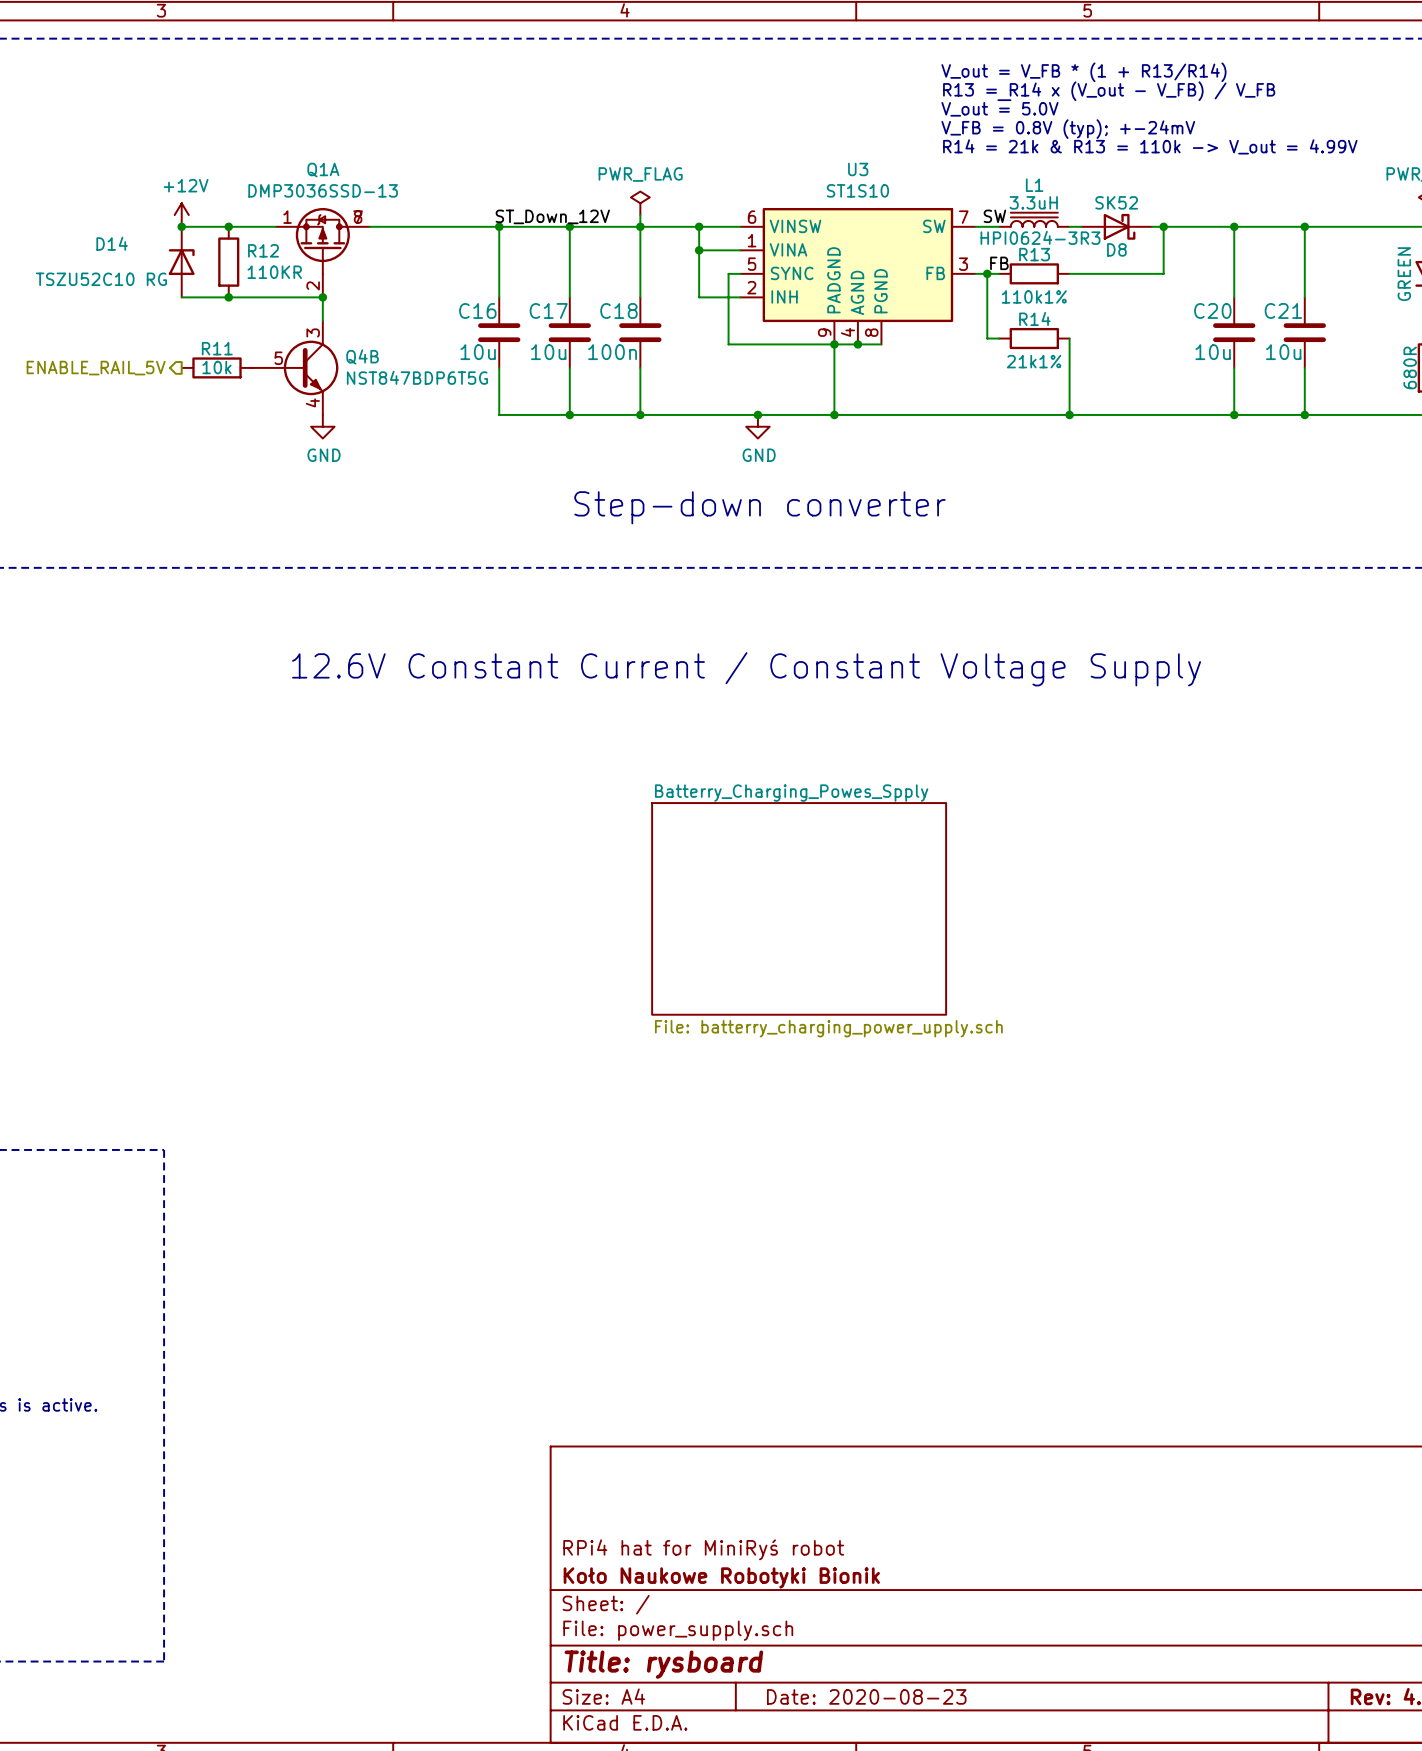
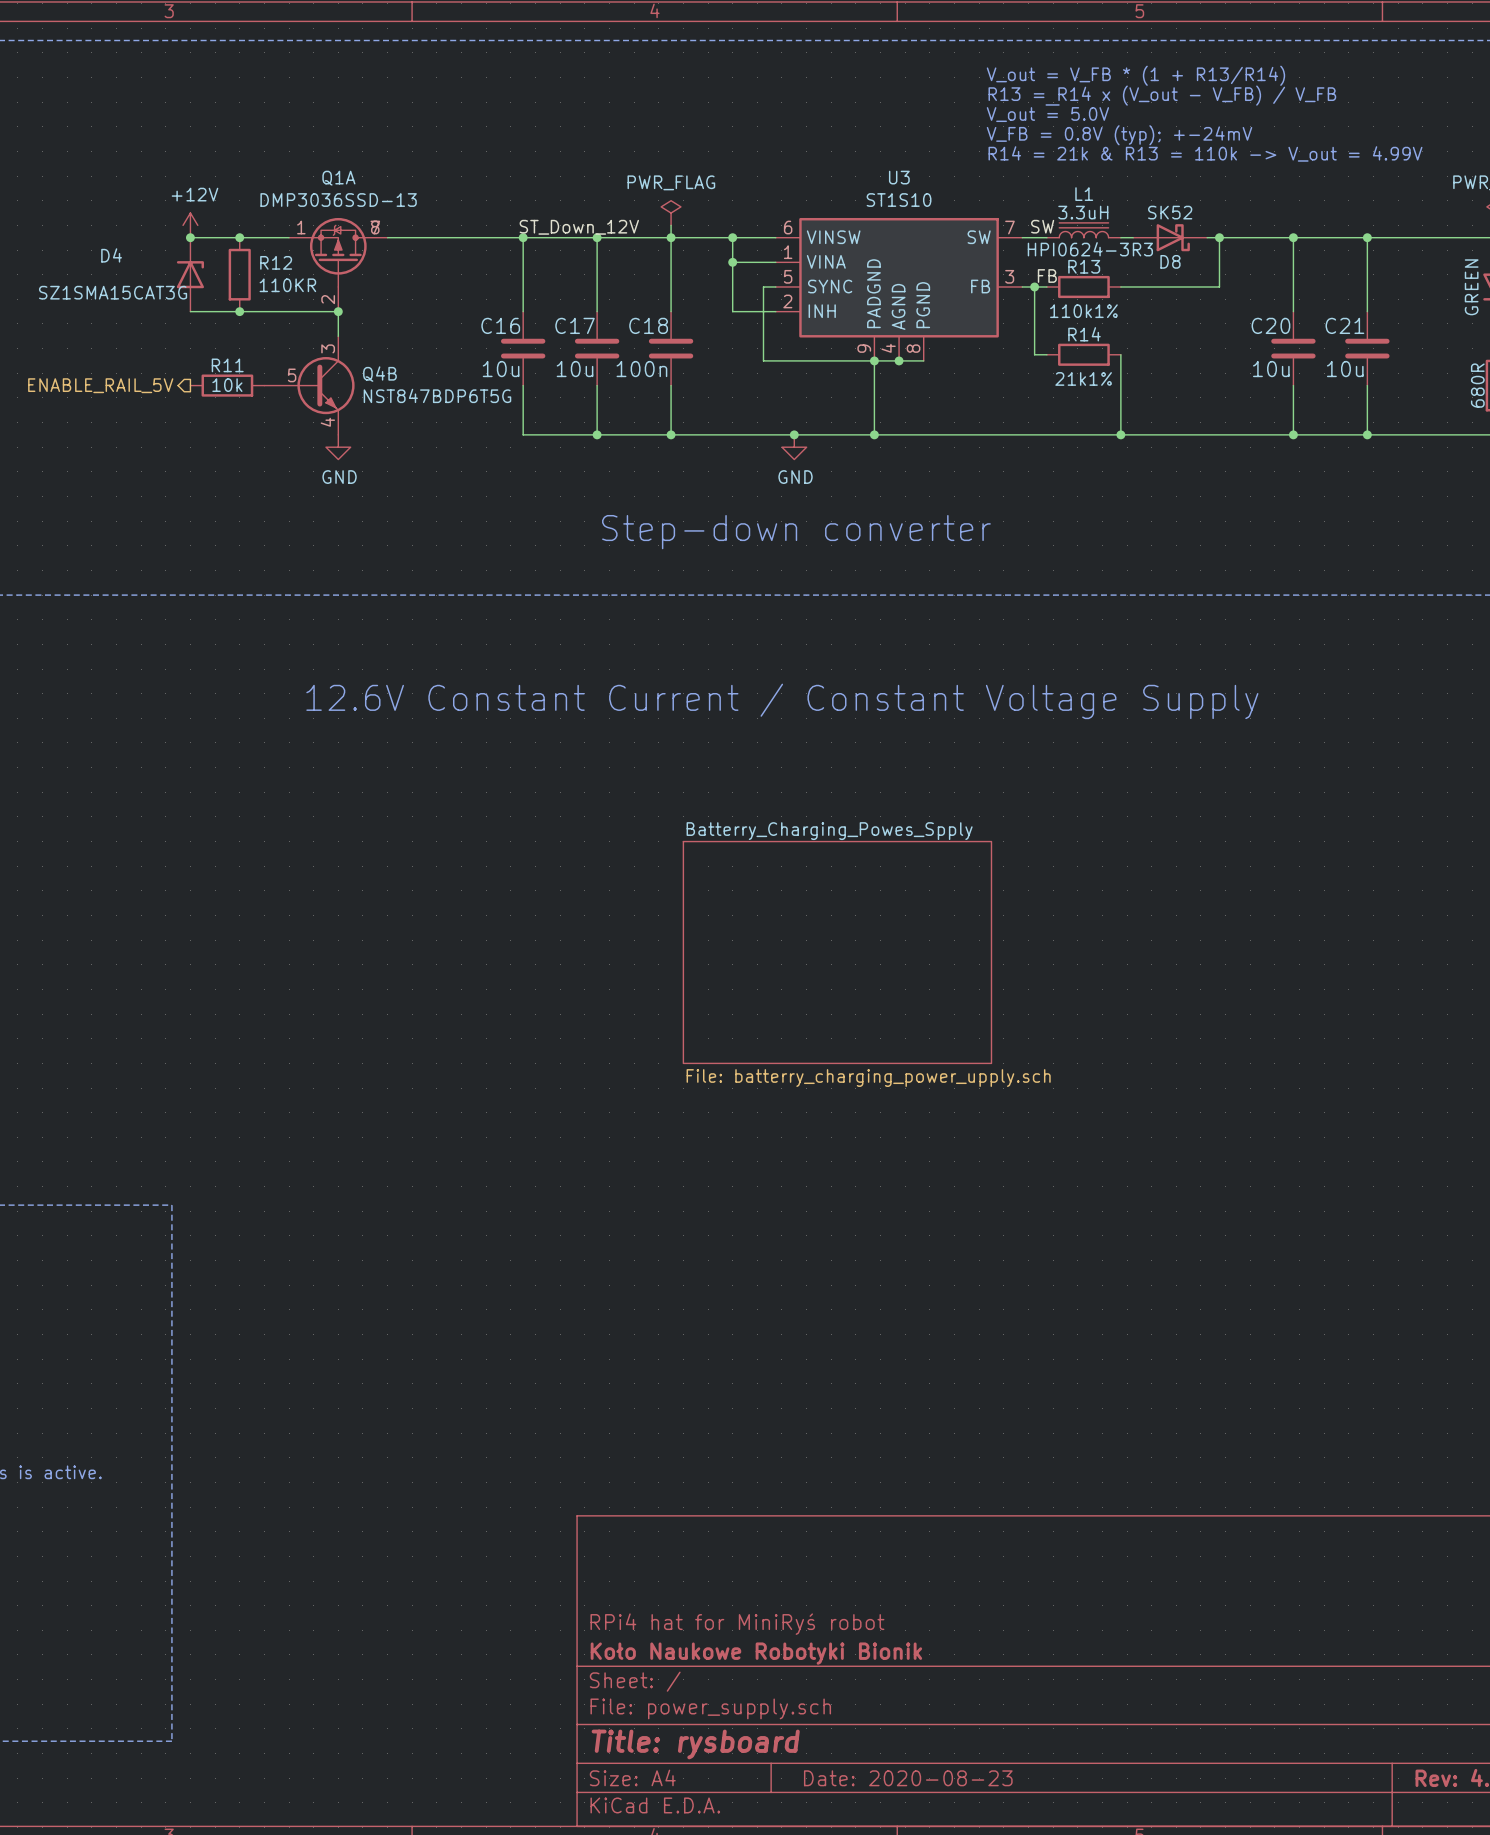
D14 name: D14 (112, 243) -> D4 (111, 255)
D14 value: TSZU52C10 RG (101, 279) -> SZ1SMA15CAT3G (113, 292)

